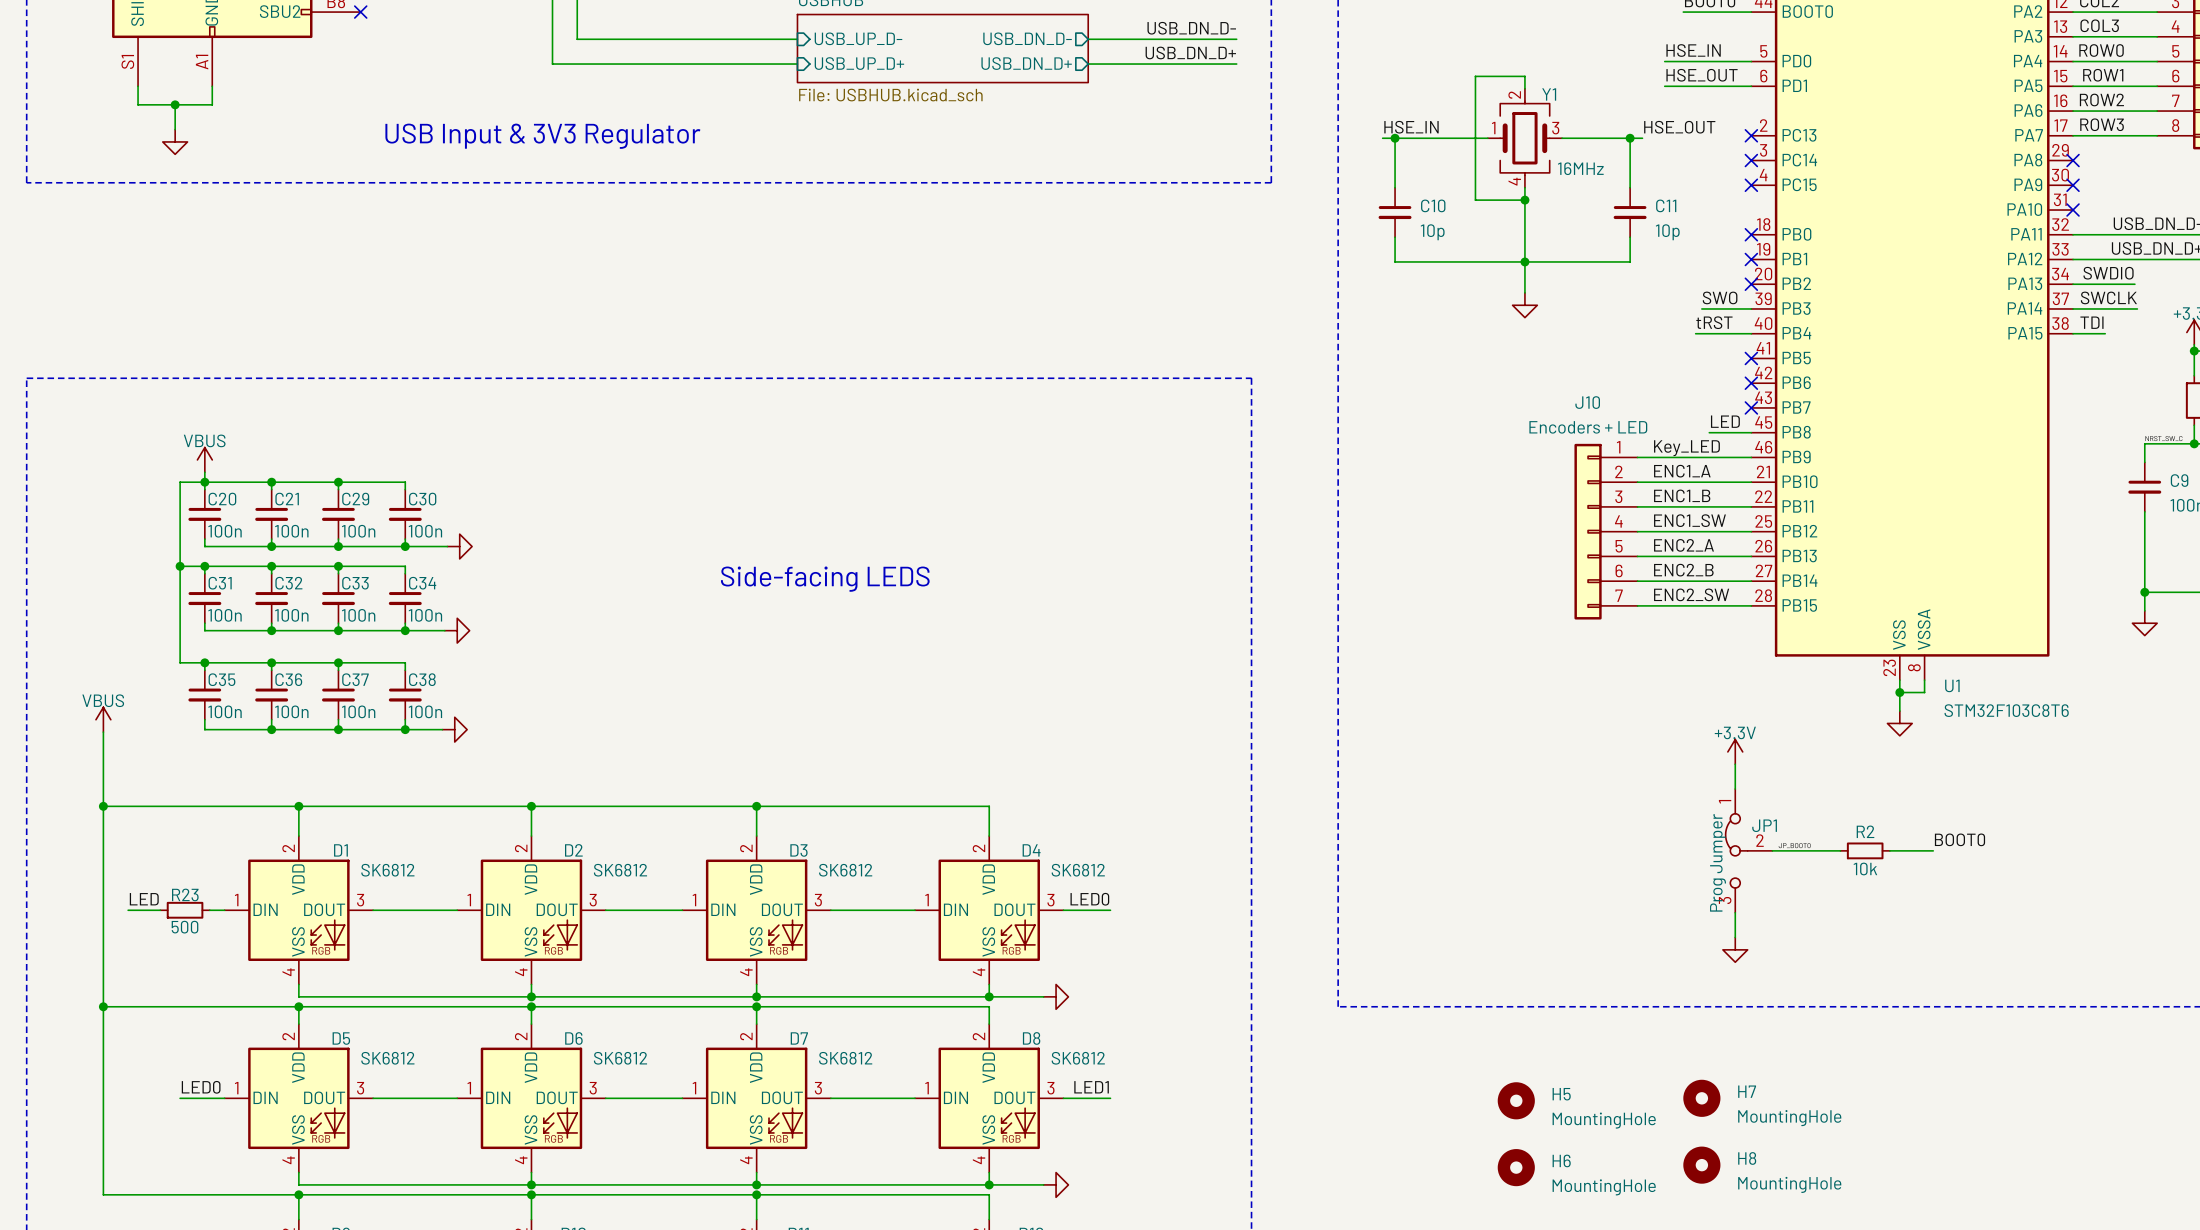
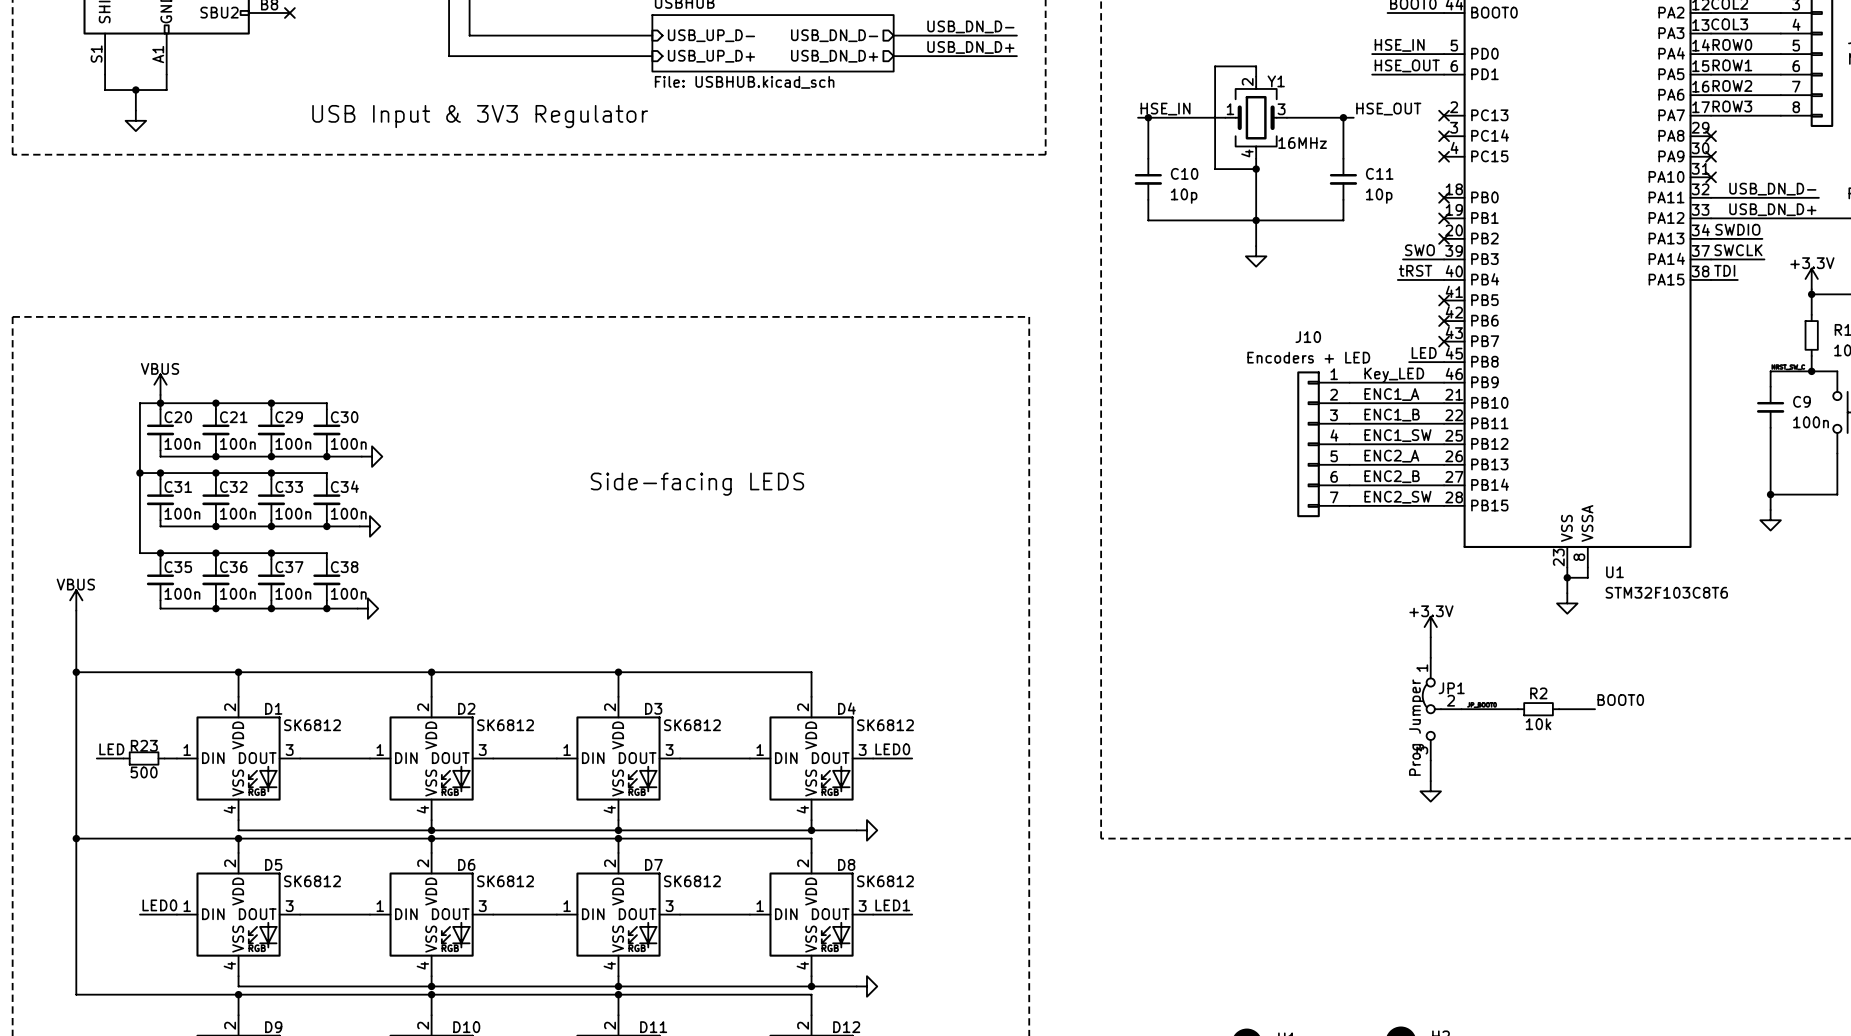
H7: MountingHole (1701, 1098) -> none
H5: MountingHole (1516, 1100) -> none
H8: MountingHole (1701, 1165) -> none
H6: MountingHole (1516, 1167) -> none

